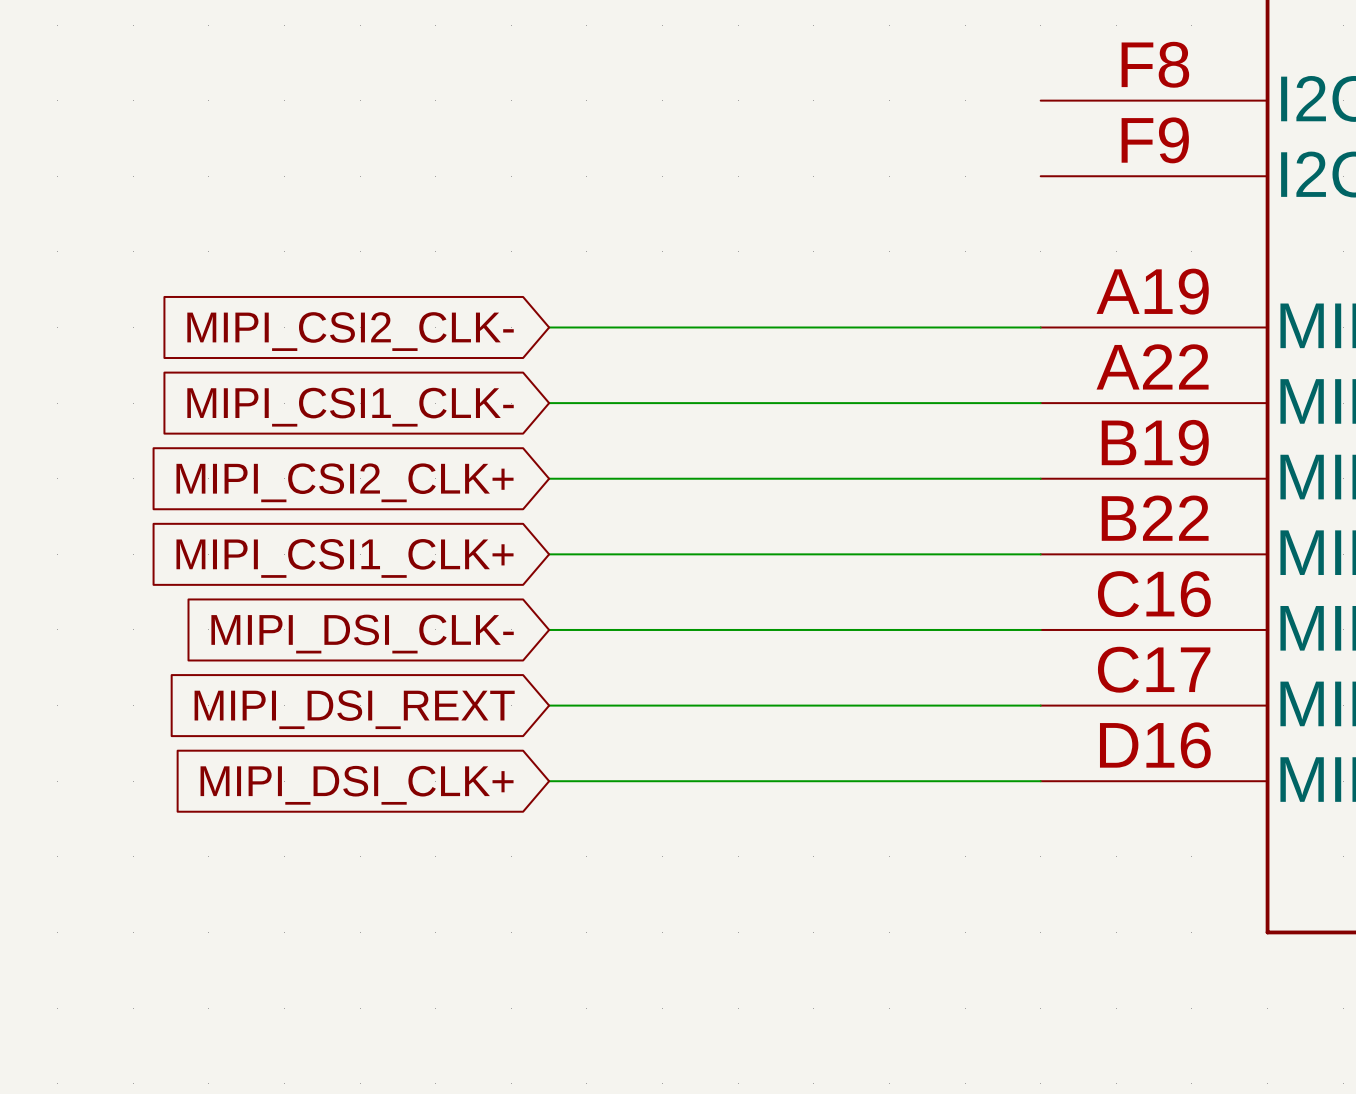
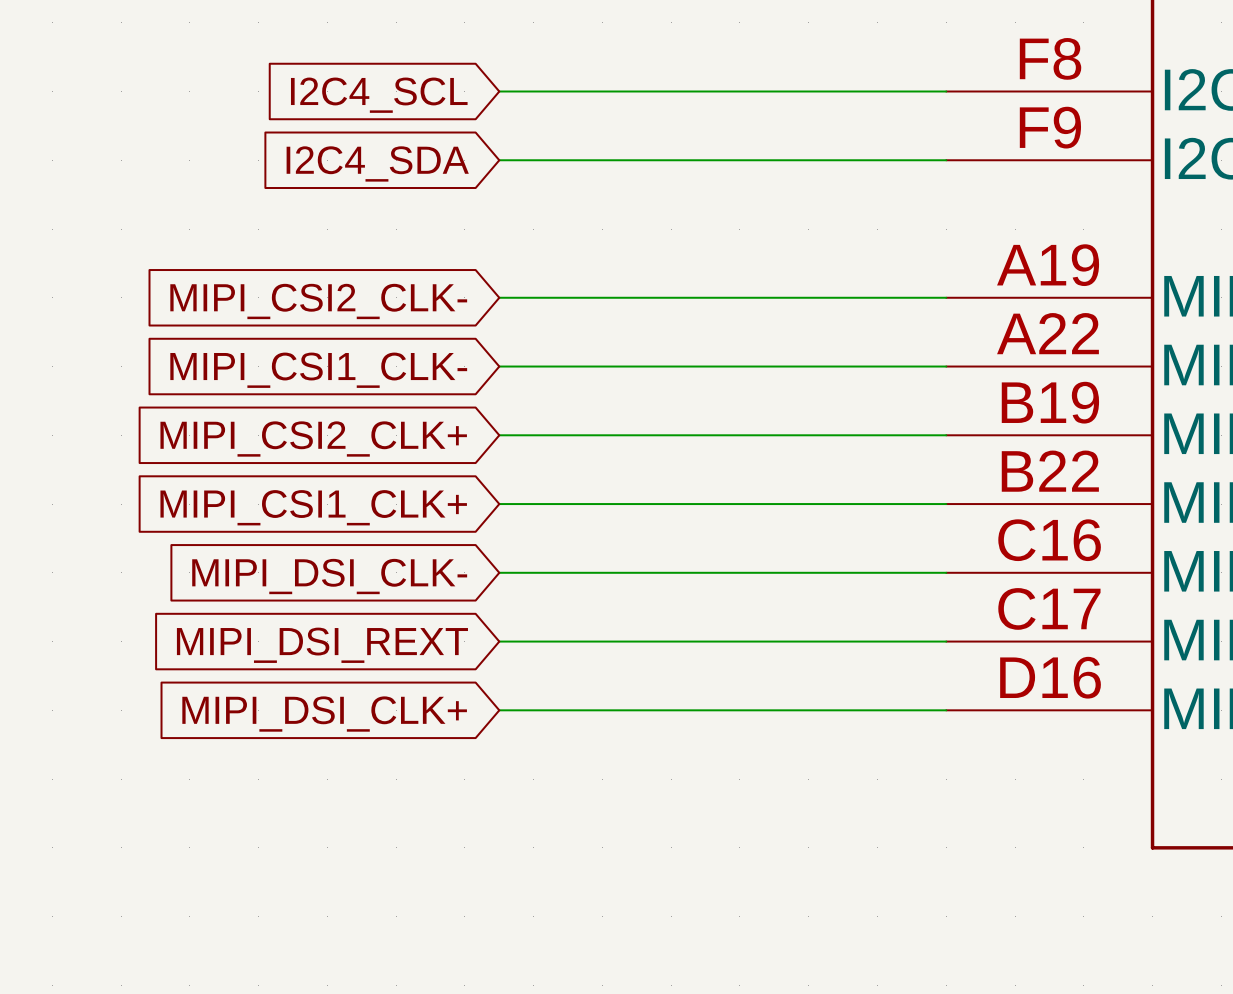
wire: none -> (499, 91) (946, 91)
global label: none -> I2C4_SCL (379, 95)
wire: none -> (499, 160) (946, 160)
global label: none -> I2C4_SDA (377, 163)

